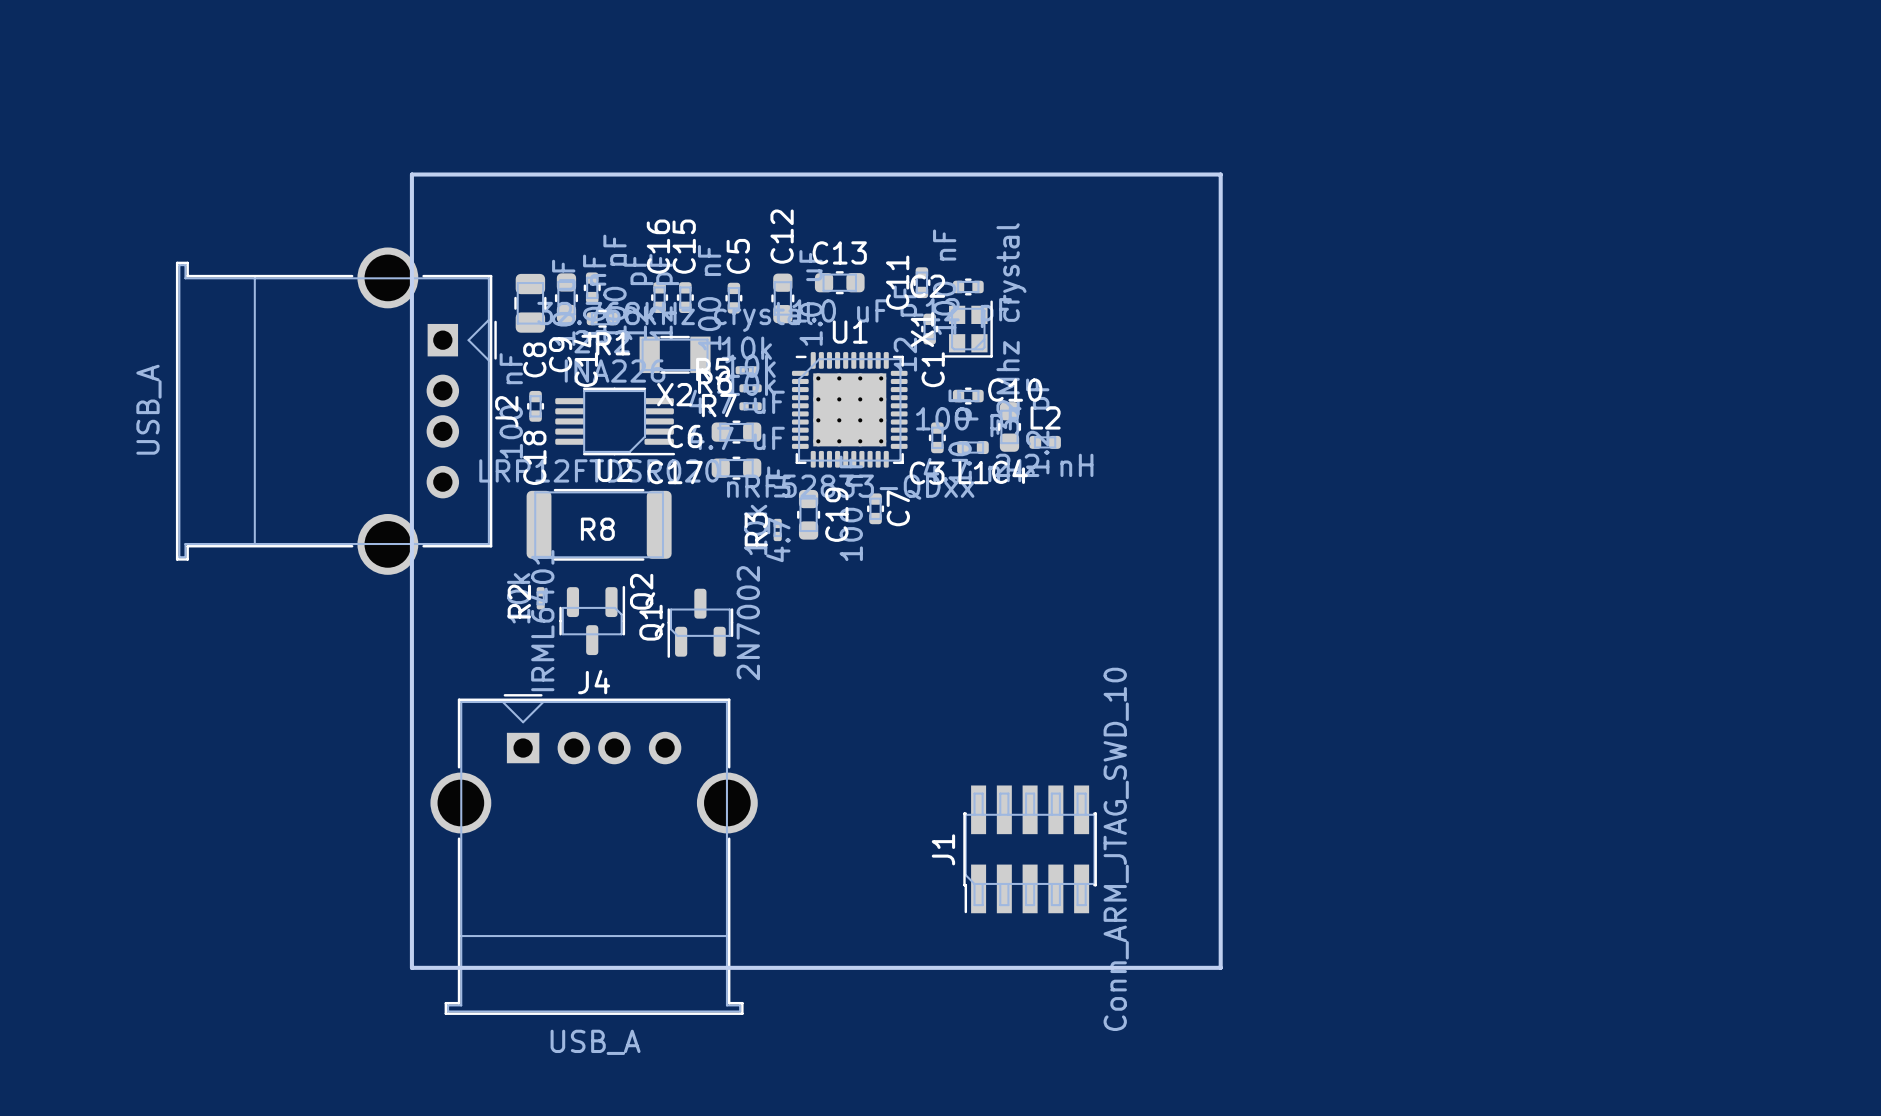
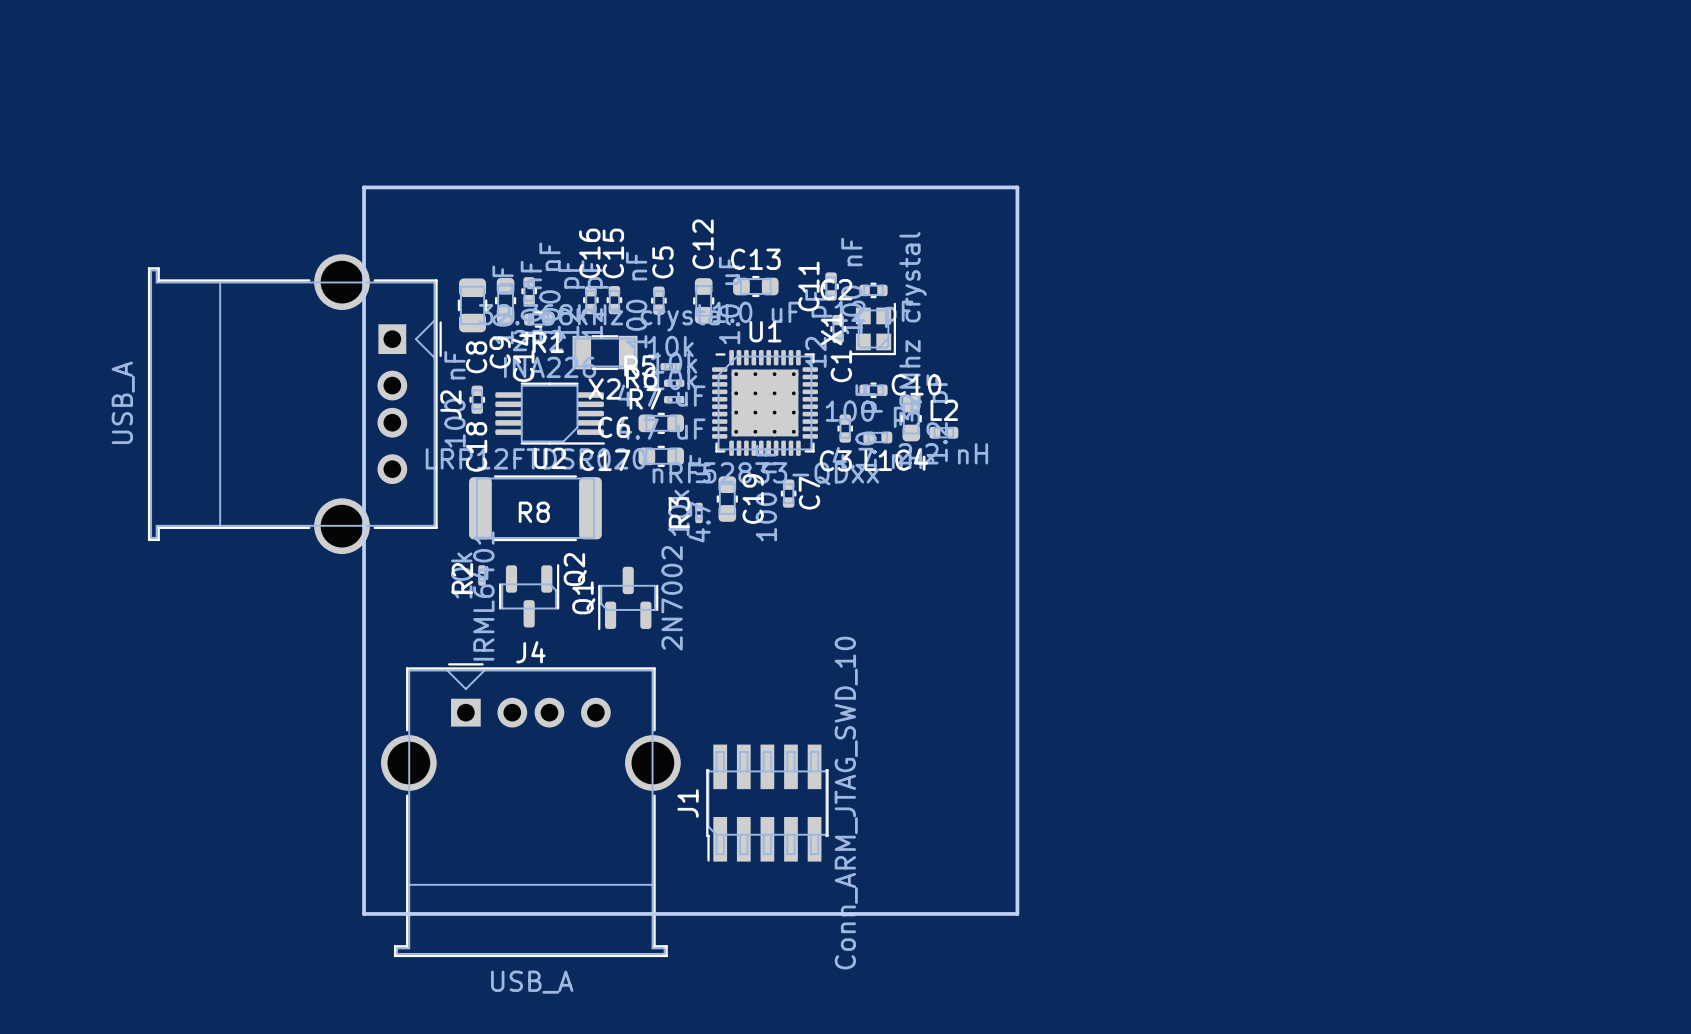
board edge: (1125, 174) (1220, 174) (1220, 967) (1125, 967) -> (1017, 187) (1017, 913)
J1 position: (1030, 849) -> (767, 803)

